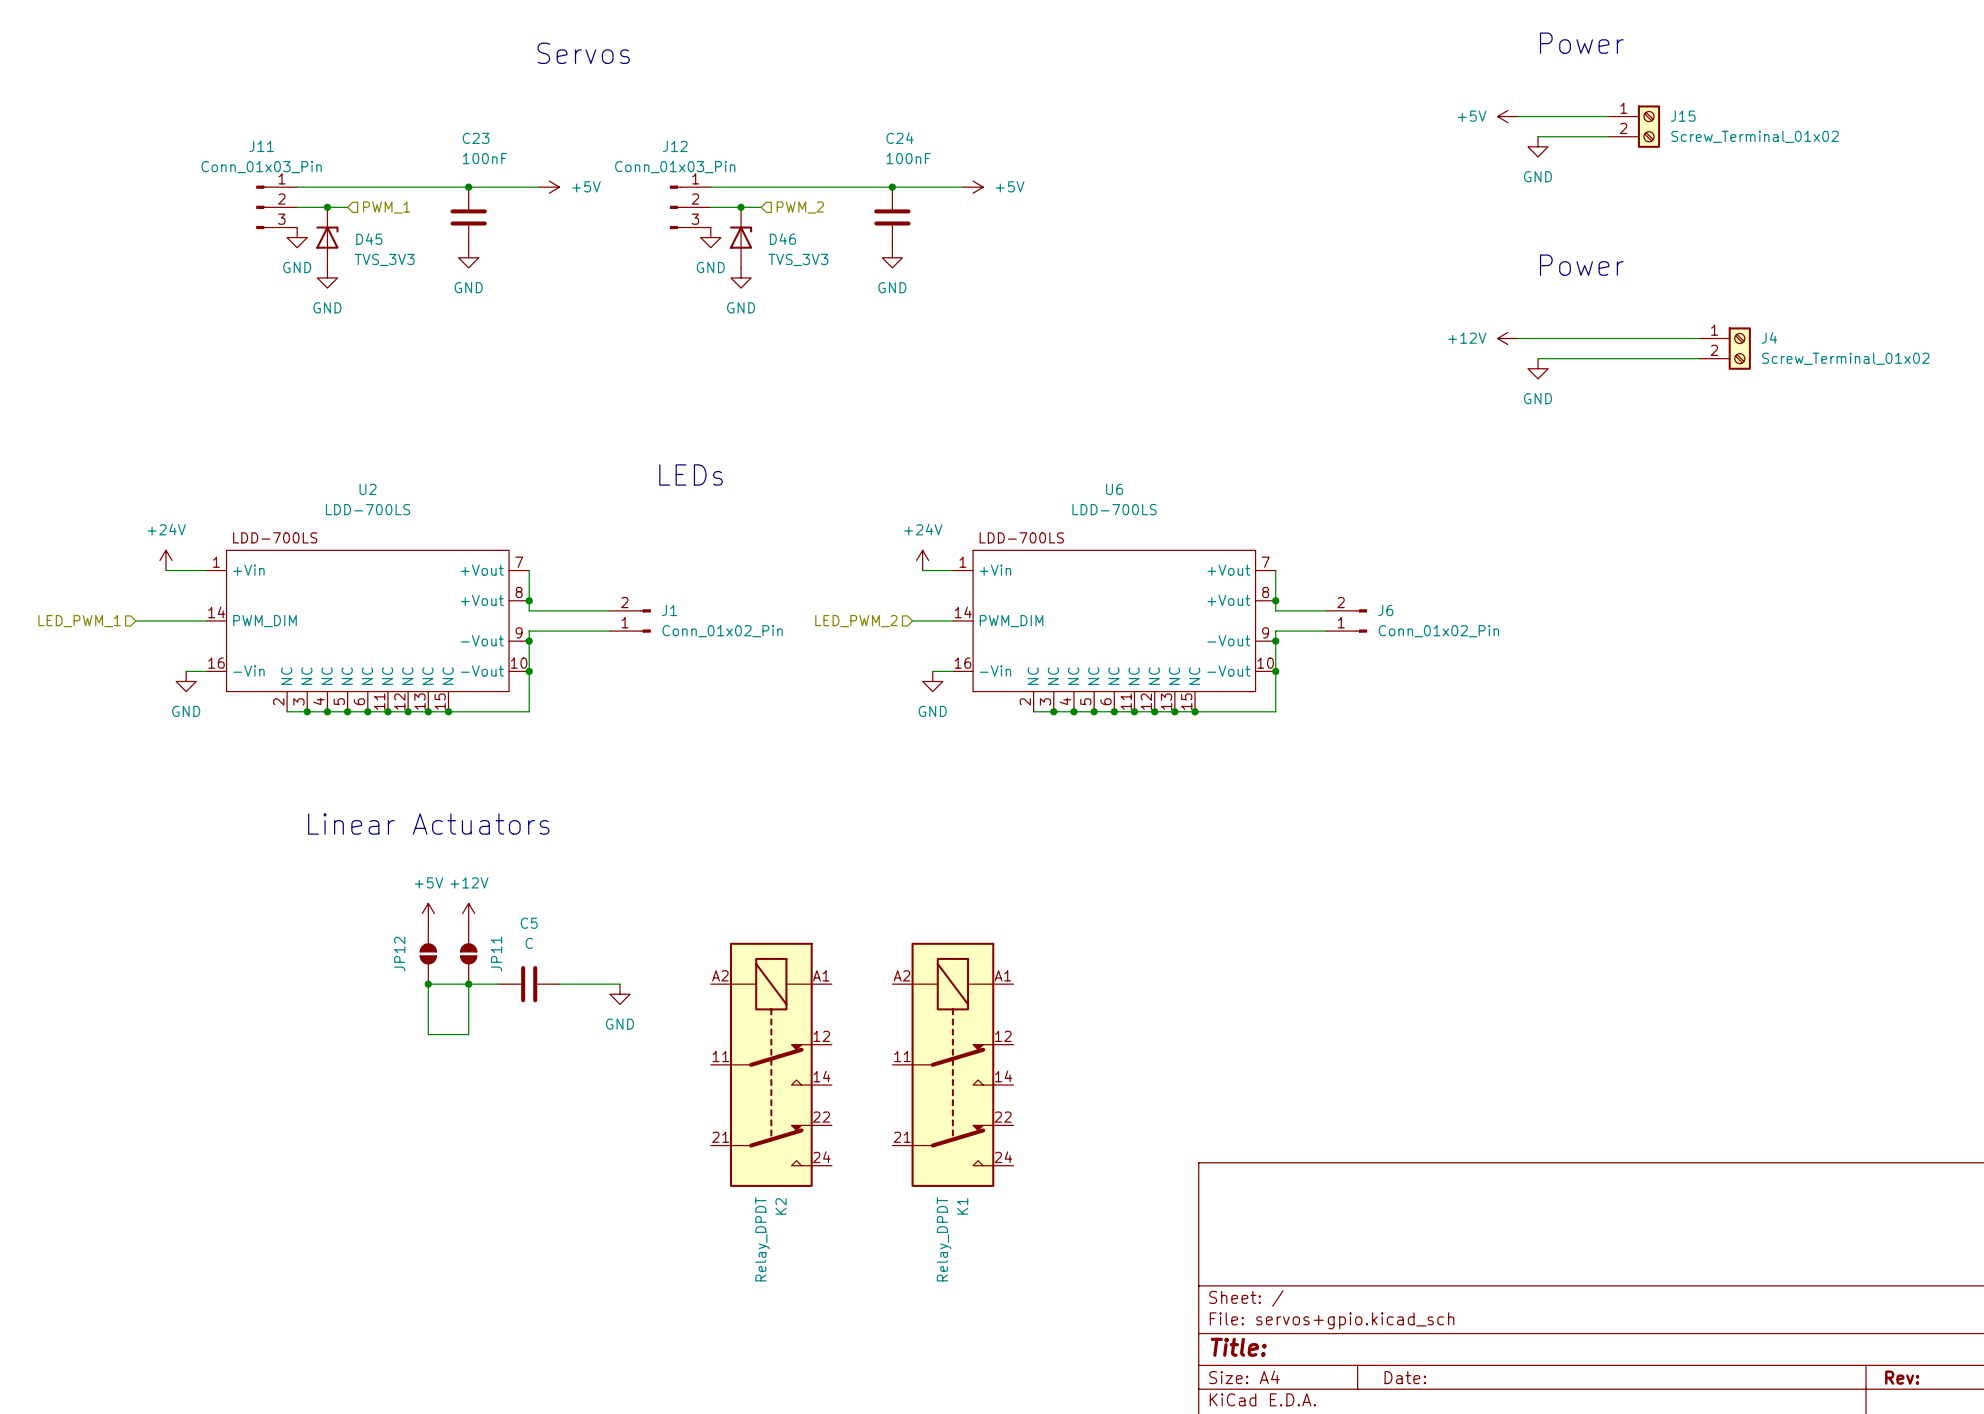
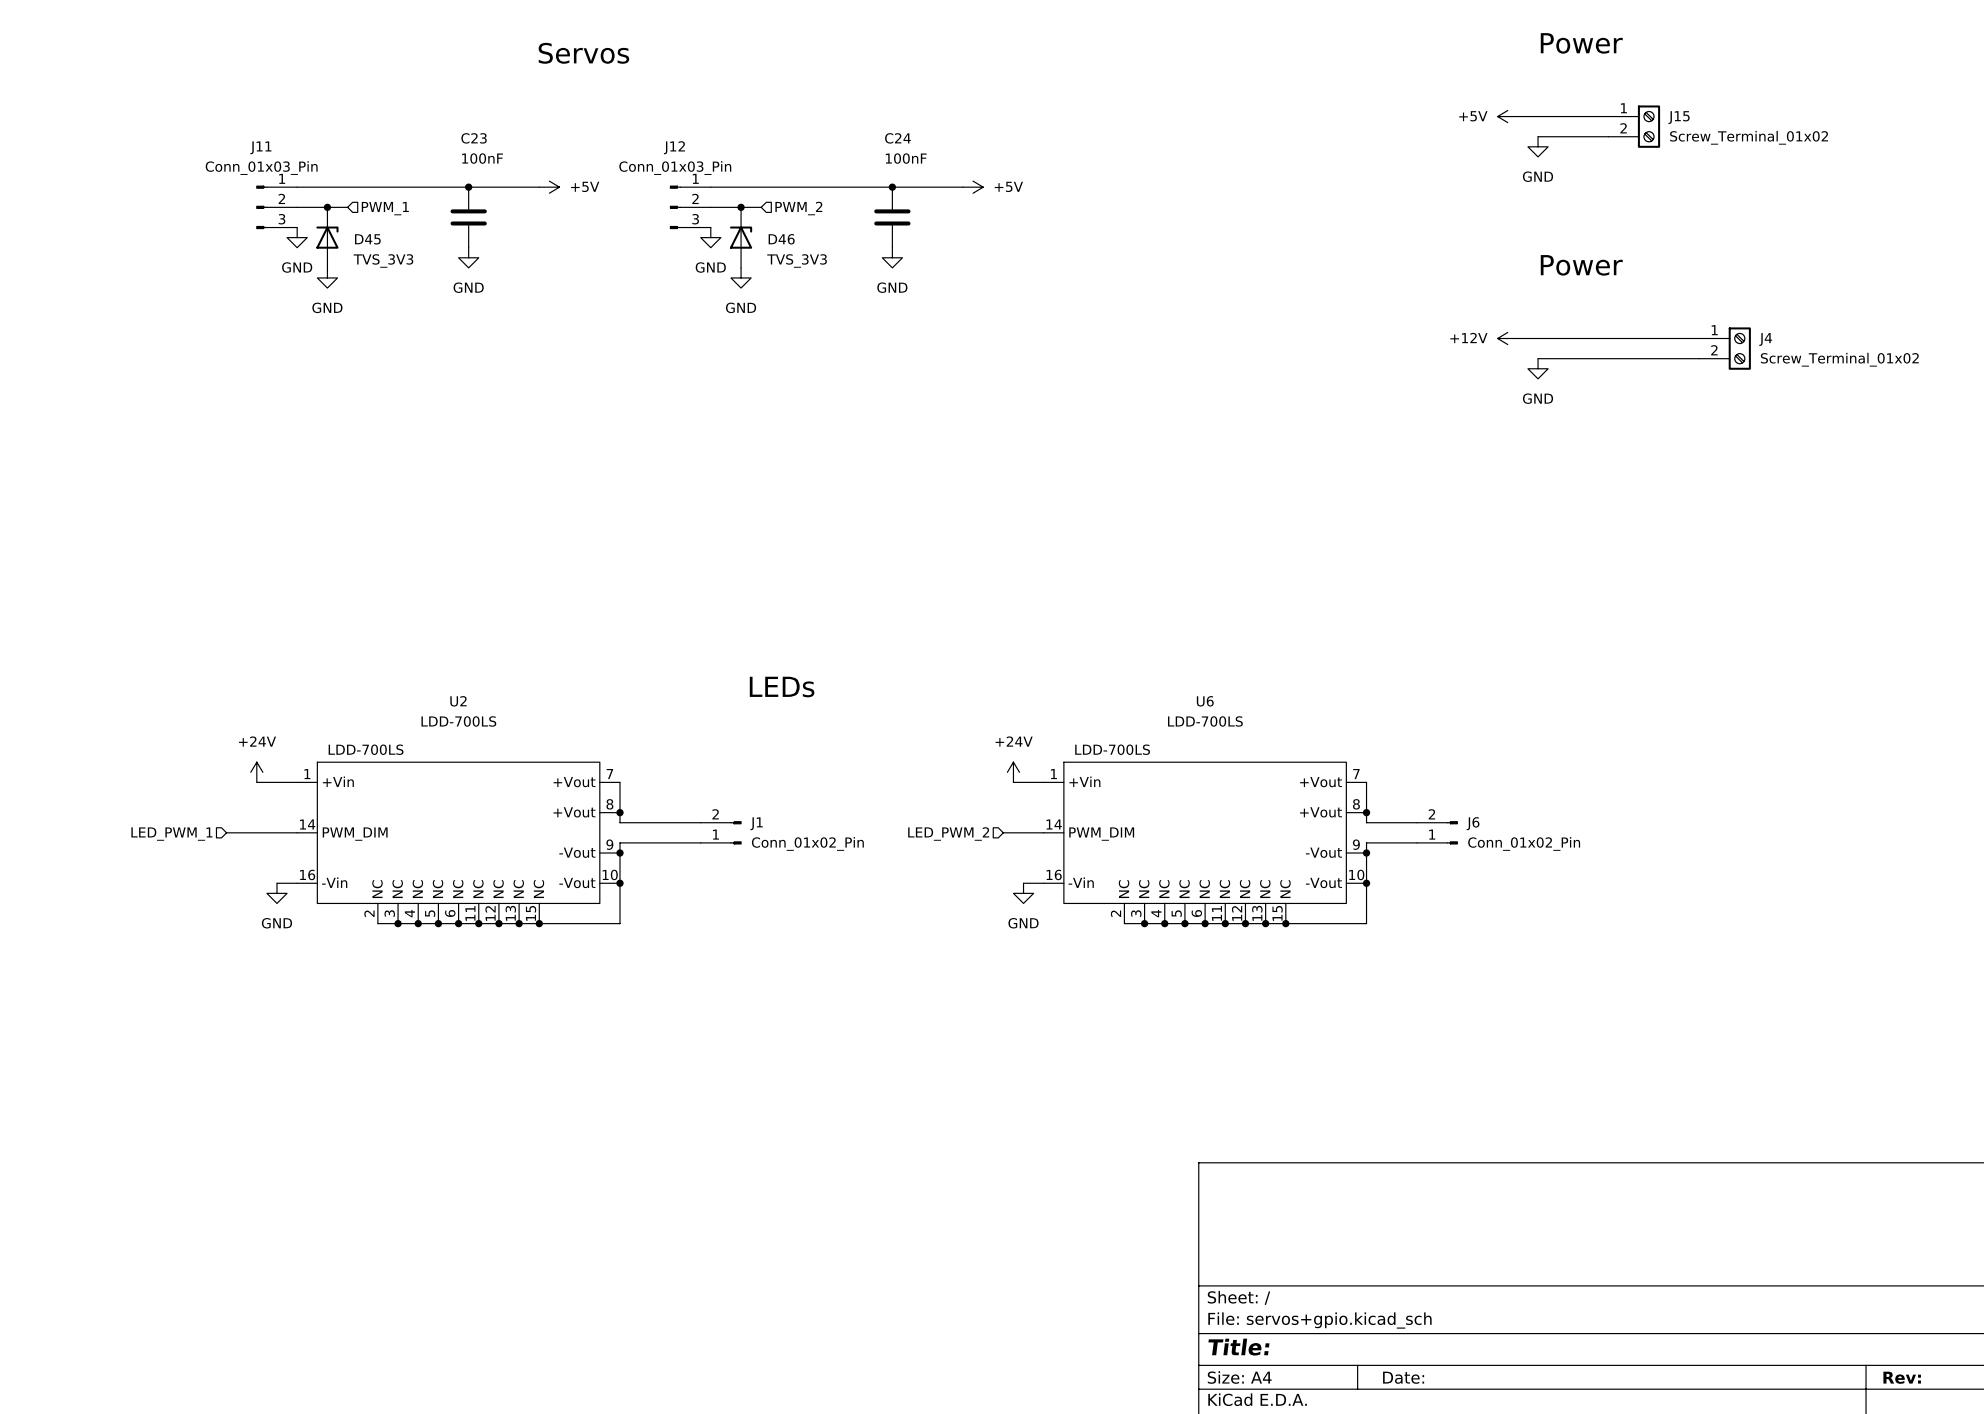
text: LEDs (691, 474) -> none
power symbol: +24V (166, 560) -> none
power symbol: +24V (922, 560) -> none
wire: (166, 570) (206, 570) -> none
wire: (529, 570) (529, 610) (609, 610) -> none
wire: (922, 570) (952, 570) -> none
wire: (1275, 570) (1275, 610) (1326, 610) -> none
junction: (529, 600) -> none
junction: (1275, 600) -> none
wire: (135, 620) (206, 620) -> none
J1 position: (630, 620) -> (721, 832)
wire: (912, 620) (952, 620) -> none
J6 position: (1346, 620) -> (1437, 832)
hierarchical label: LED_PWM_1 (79, 621) -> none
hierarchical label: LED_PWM_2 (856, 621) -> none
U2 position: (367, 631) -> (458, 842)
wire: (609, 631) (529, 631) (529, 711) (287, 711) -> none
U6 position: (1114, 631) -> (1205, 842)
wire: (1326, 631) (1275, 631) (1275, 711) (1033, 711) -> none
junction: (529, 641) -> none
junction: (1275, 641) -> none
wire: (186, 671) (206, 671) -> none
junction: (529, 671) -> none
wire: (932, 671) (952, 671) -> none
junction: (1275, 671) -> none
power symbol: GND (186, 681) -> none
power symbol: GND (932, 681) -> none
text: none -> LEDs (782, 687)
junction: (307, 711) -> none
junction: (327, 711) -> none
junction: (347, 711) -> none
junction: (367, 711) -> none
junction: (387, 711) -> none
junction: (408, 711) -> none
junction: (428, 711) -> none
junction: (448, 711) -> none
junction: (1053, 711) -> none
junction: (1073, 711) -> none
junction: (1094, 711) -> none
junction: (1114, 711) -> none
junction: (1134, 711) -> none
junction: (1154, 711) -> none
junction: (1174, 711) -> none
junction: (1195, 711) -> none
power symbol: none -> +24V (256, 772)
power symbol: none -> +24V (1013, 772)
wire: none -> (256, 782) (297, 782)
wire: none -> (619, 782) (619, 822) (700, 822)
wire: none -> (1013, 782) (1043, 782)
wire: none -> (1366, 782) (1366, 822) (1416, 822)
junction: none -> (619, 812)
junction: none -> (1366, 812)
text: Linear Actuators (428, 824) -> none
hierarchical label: none -> LED_PWM_1 (171, 834)
wire: none -> (226, 832) (297, 832)
hierarchical label: none -> LED_PWM_2 (948, 833)
wire: none -> (1003, 832) (1043, 832)
wire: none -> (700, 842) (619, 842) (619, 923) (377, 923)
wire: none -> (1416, 842) (1366, 842) (1366, 923) (1124, 923)
junction: none -> (619, 853)
junction: none -> (1366, 853)
wire: none -> (276, 883) (297, 883)
junction: none -> (619, 883)
wire: none -> (1023, 883) (1043, 883)
junction: none -> (1366, 883)
power symbol: none -> GND (276, 893)
power symbol: none -> GND (1023, 893)
power symbol: +5V (428, 913) -> none
power symbol: +12V (468, 913) -> none
junction: none -> (398, 923)
junction: none -> (418, 923)
junction: none -> (438, 923)
junction: none -> (458, 923)
junction: none -> (478, 923)
junction: none -> (498, 923)
junction: none -> (519, 923)
junction: none -> (539, 923)
junction: none -> (1144, 923)
junction: none -> (1164, 923)
junction: none -> (1184, 923)
junction: none -> (1205, 923)
junction: none -> (1225, 923)
junction: none -> (1245, 923)
junction: none -> (1265, 923)
junction: none -> (1285, 923)
JP12: (428, 953) -> none
JP11: (468, 953) -> none
junction: (428, 984) -> none
wire: (468, 984) (468, 1034) (428, 1034) (428, 984) (498, 984) -> none
junction: (468, 984) -> none
C5: C (529, 984) -> none
wire: (559, 984) (619, 984) -> none
power symbol: GND (619, 994) -> none
K2: Relay_DPDT (771, 1064) -> none
K1: Relay_DPDT (952, 1064) -> none

